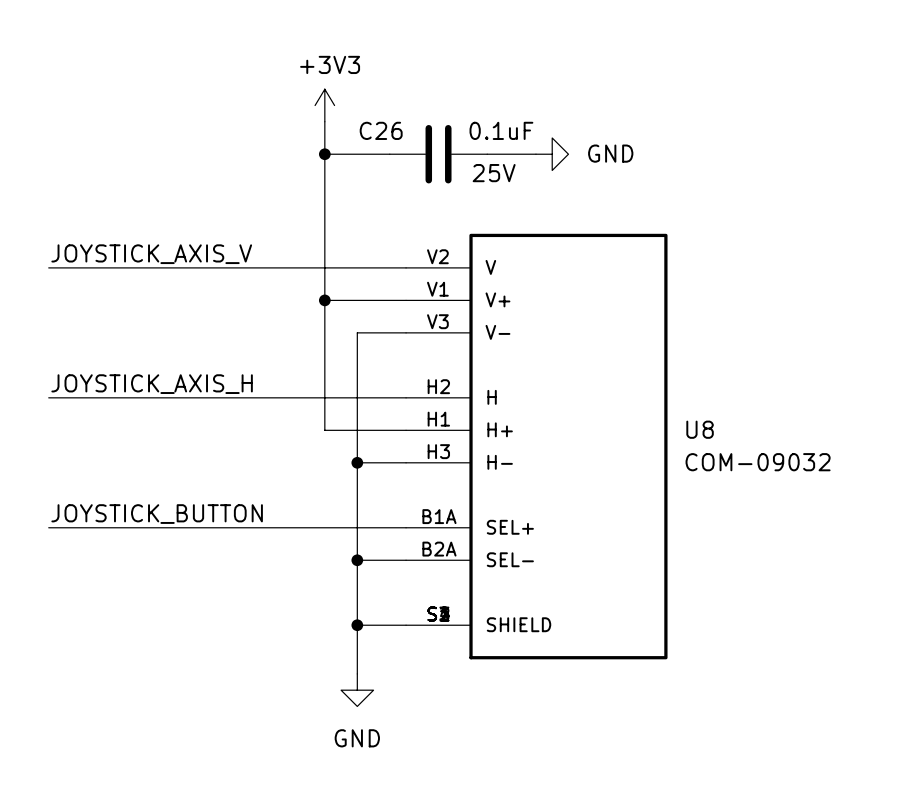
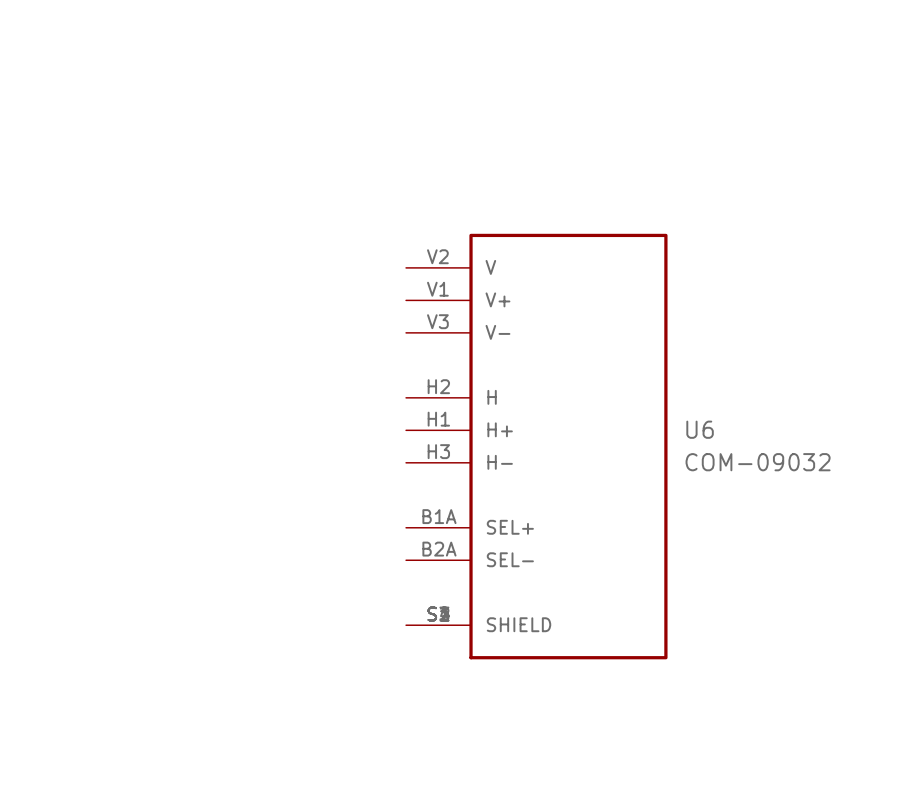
power symbol: +3V3 (324, 105) -> none
wire: (324, 121) (324, 430) (406, 430) -> none
wire: (324, 154) (389, 154) -> none
junction: (324, 154) -> none
C26: 0.1uF (438, 154) -> none
wire: (487, 154) (535, 154) -> none
power symbol: GND (552, 154) -> none
label: JOYSTICK_AXIS_V (151, 254) -> none
wire: (48, 267) (406, 267) -> none
wire: (324, 300) (406, 300) -> none
junction: (324, 300) -> none
wire: (406, 332) (357, 332) (357, 673) -> none
label: JOYSTICK_AXIS_H (152, 384) -> none
wire: (48, 397) (406, 397) -> none
U8 name: U8 (700, 429) -> U6 (700, 429)
wire: (357, 462) (406, 462) -> none
junction: (357, 462) -> none
label: JOYSTICK_BUTTON (157, 514) -> none
wire: (48, 527) (406, 527) -> none
wire: (357, 560) (406, 560) -> none
junction: (357, 560) -> none
wire: (357, 625) (406, 625) -> none
junction: (357, 625) -> none
power symbol: GND (357, 690) -> none

